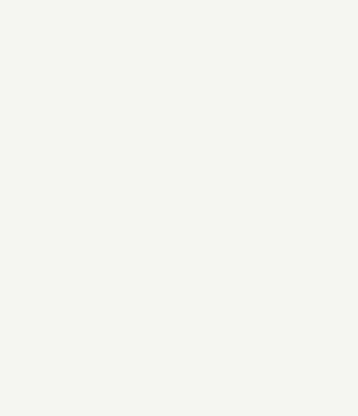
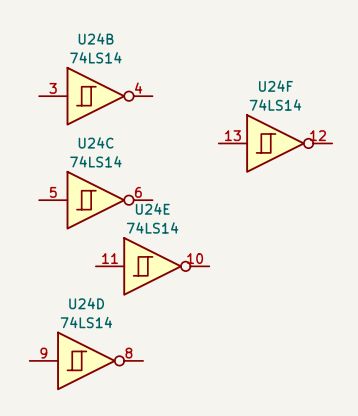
U24B: none -> 74LS14 (95, 96)
U24F: none -> 74LS14 (275, 143)
U24C: none -> 74LS14 (95, 200)
U24E: none -> 74LS14 (152, 266)
U24D: none -> 74LS14 (86, 360)

